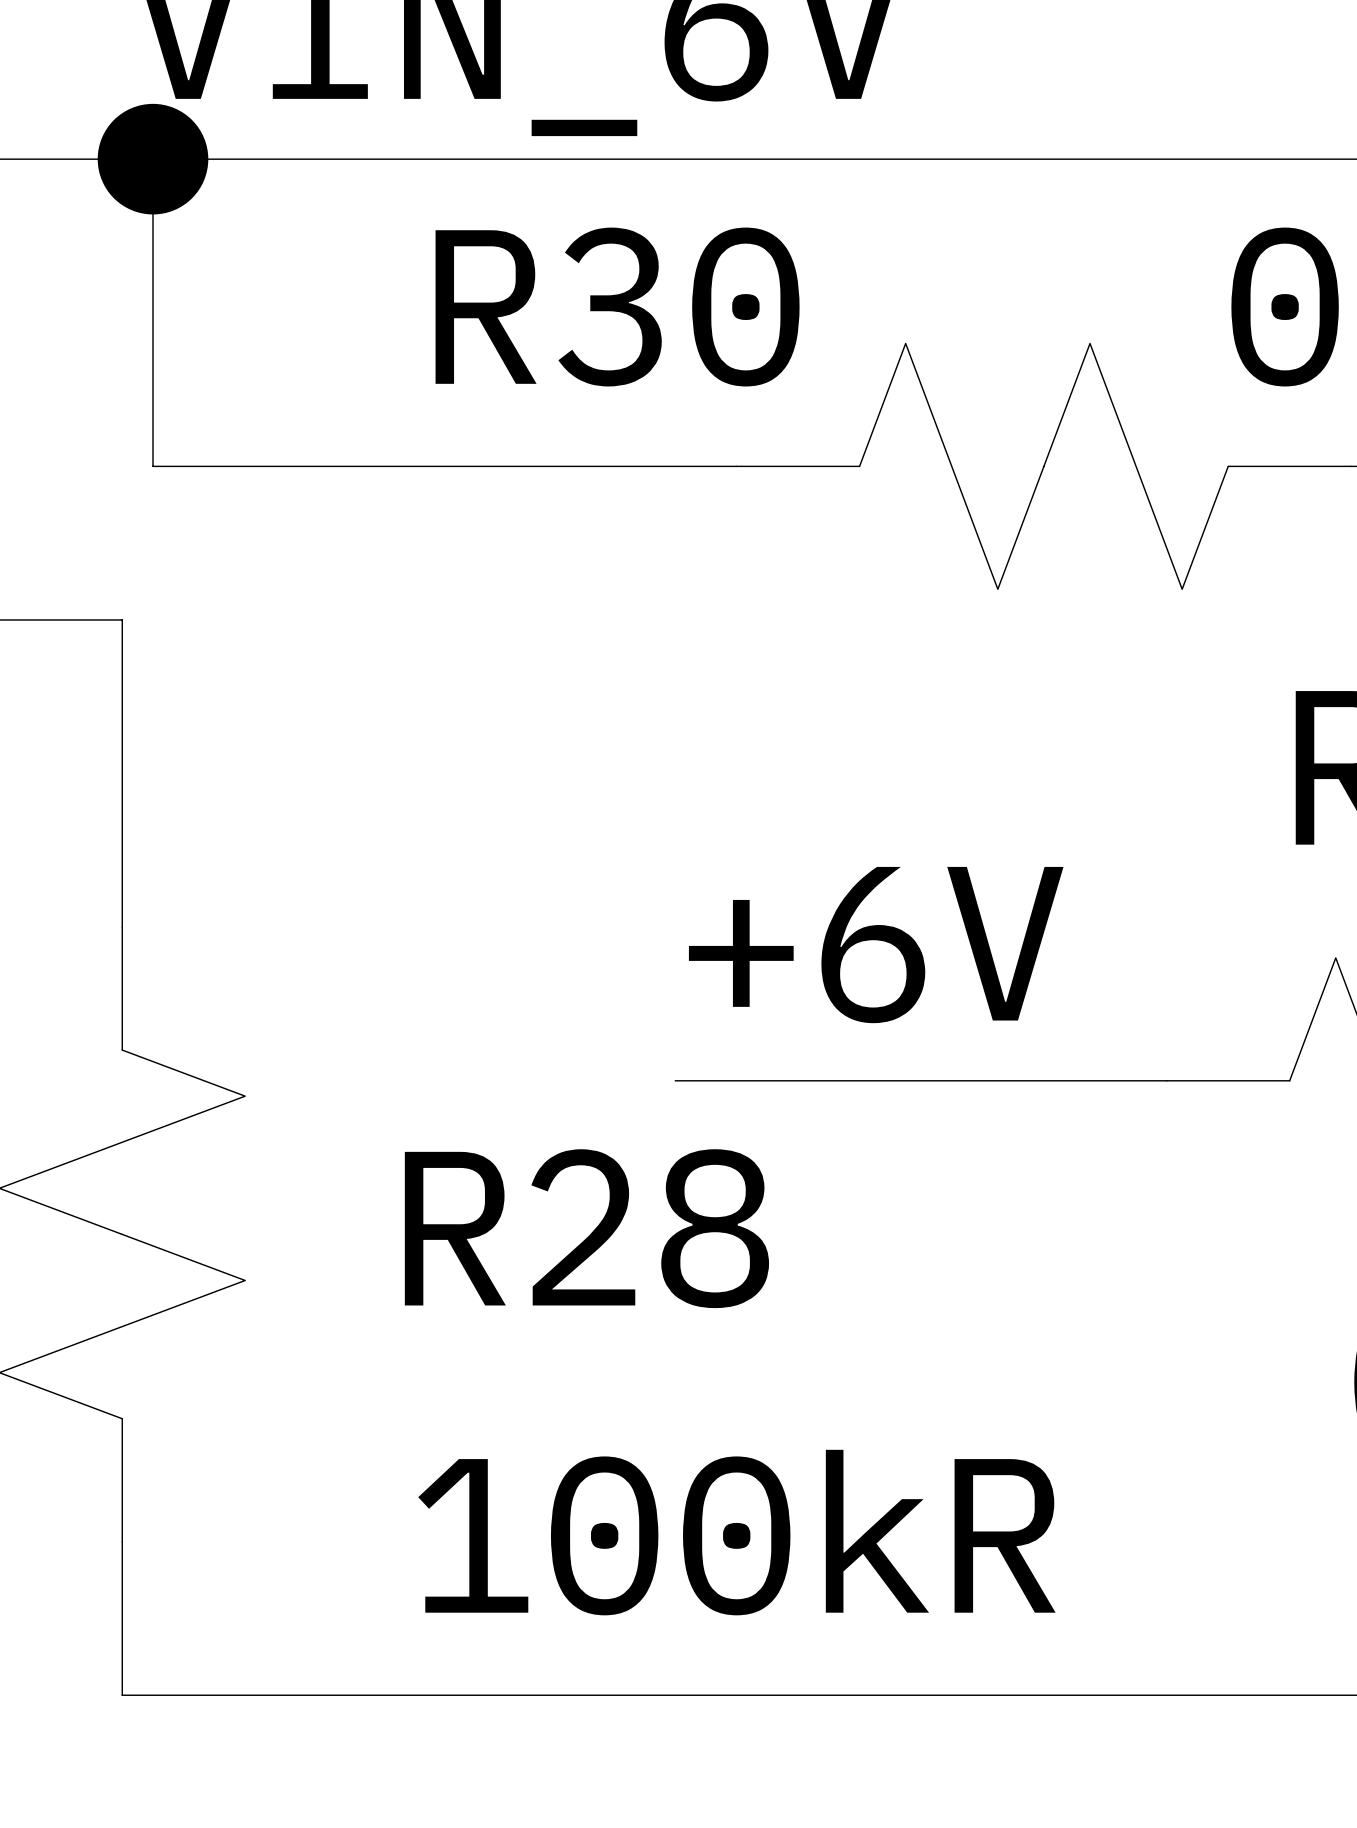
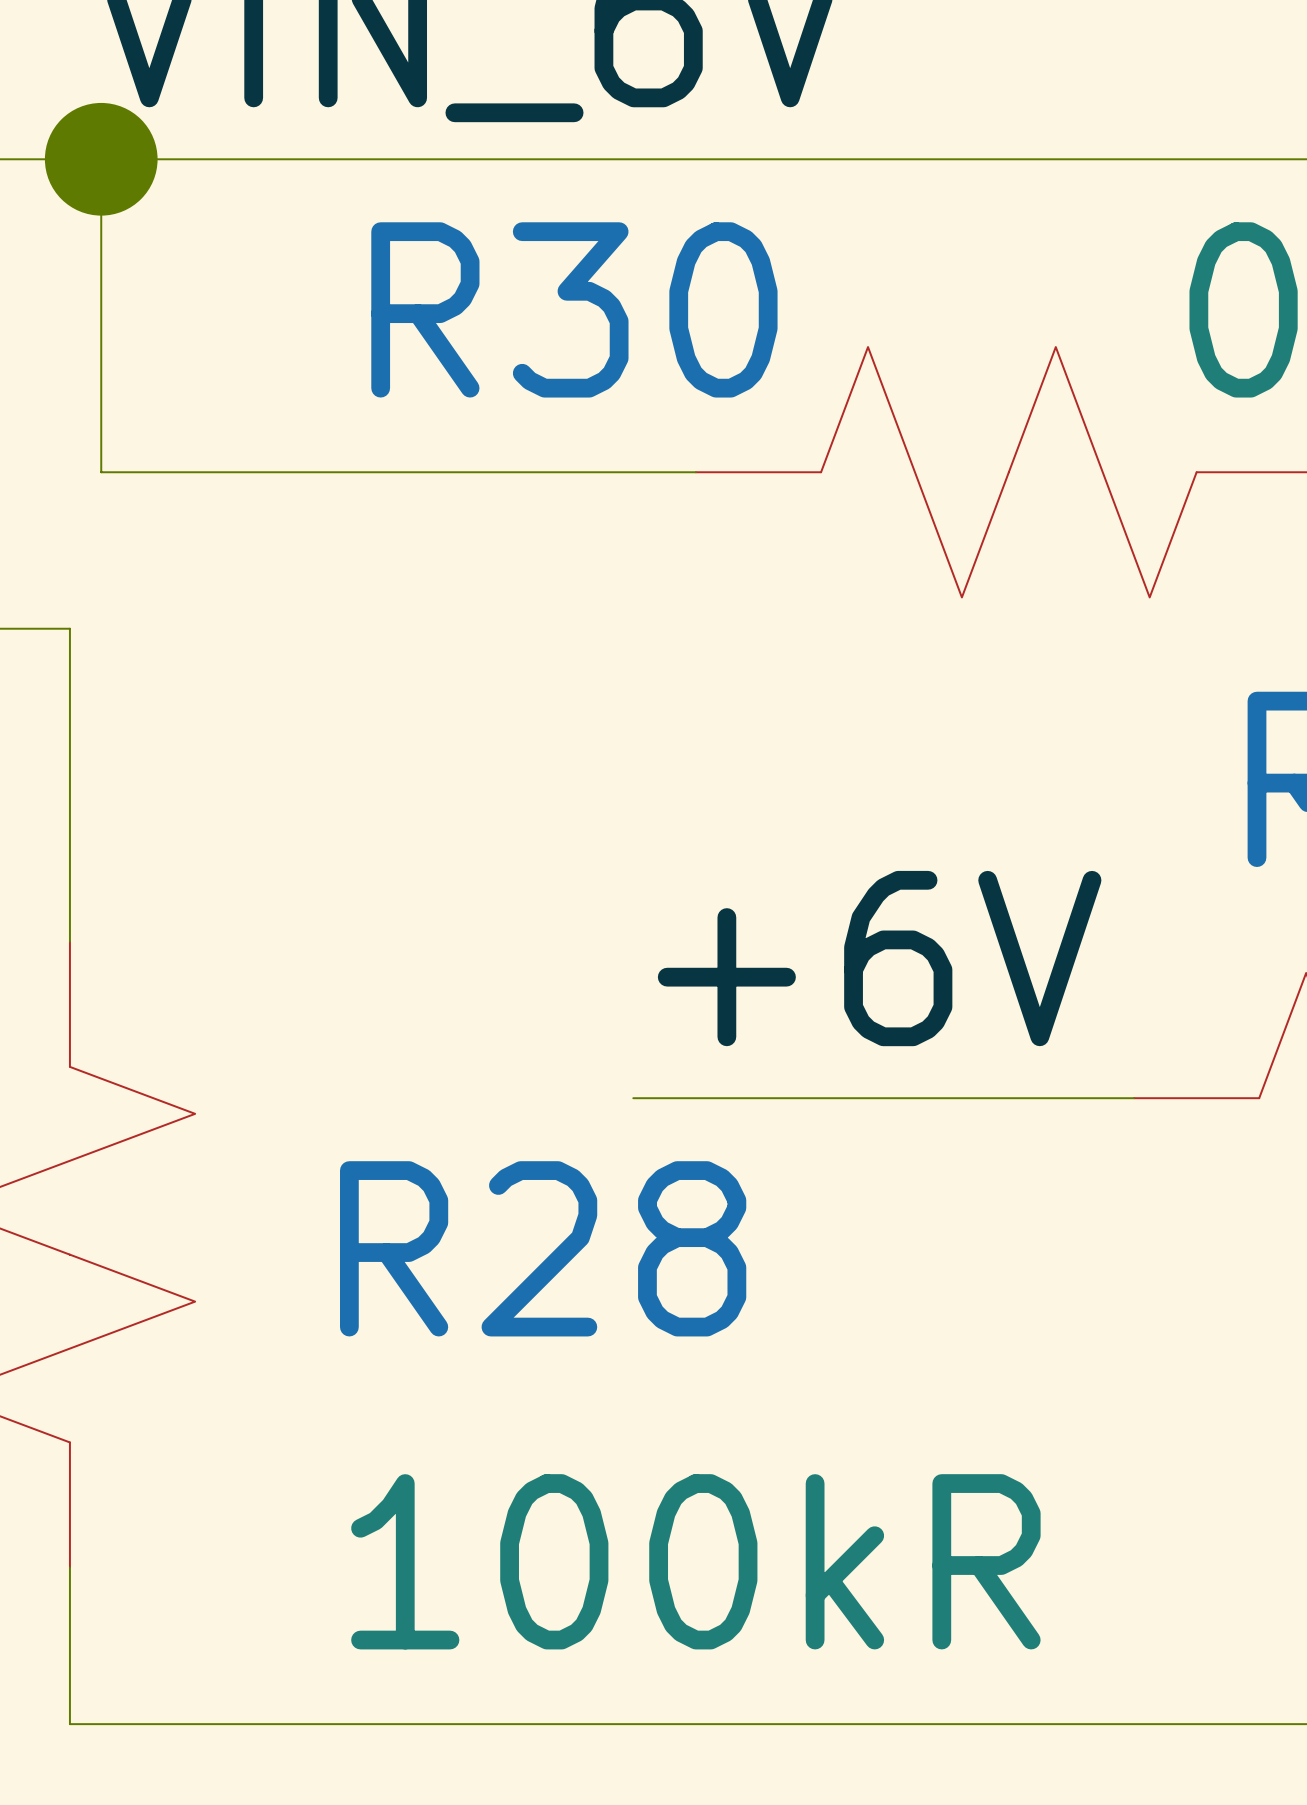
label position: +6V (876, 945) -> +6V (879, 958)

